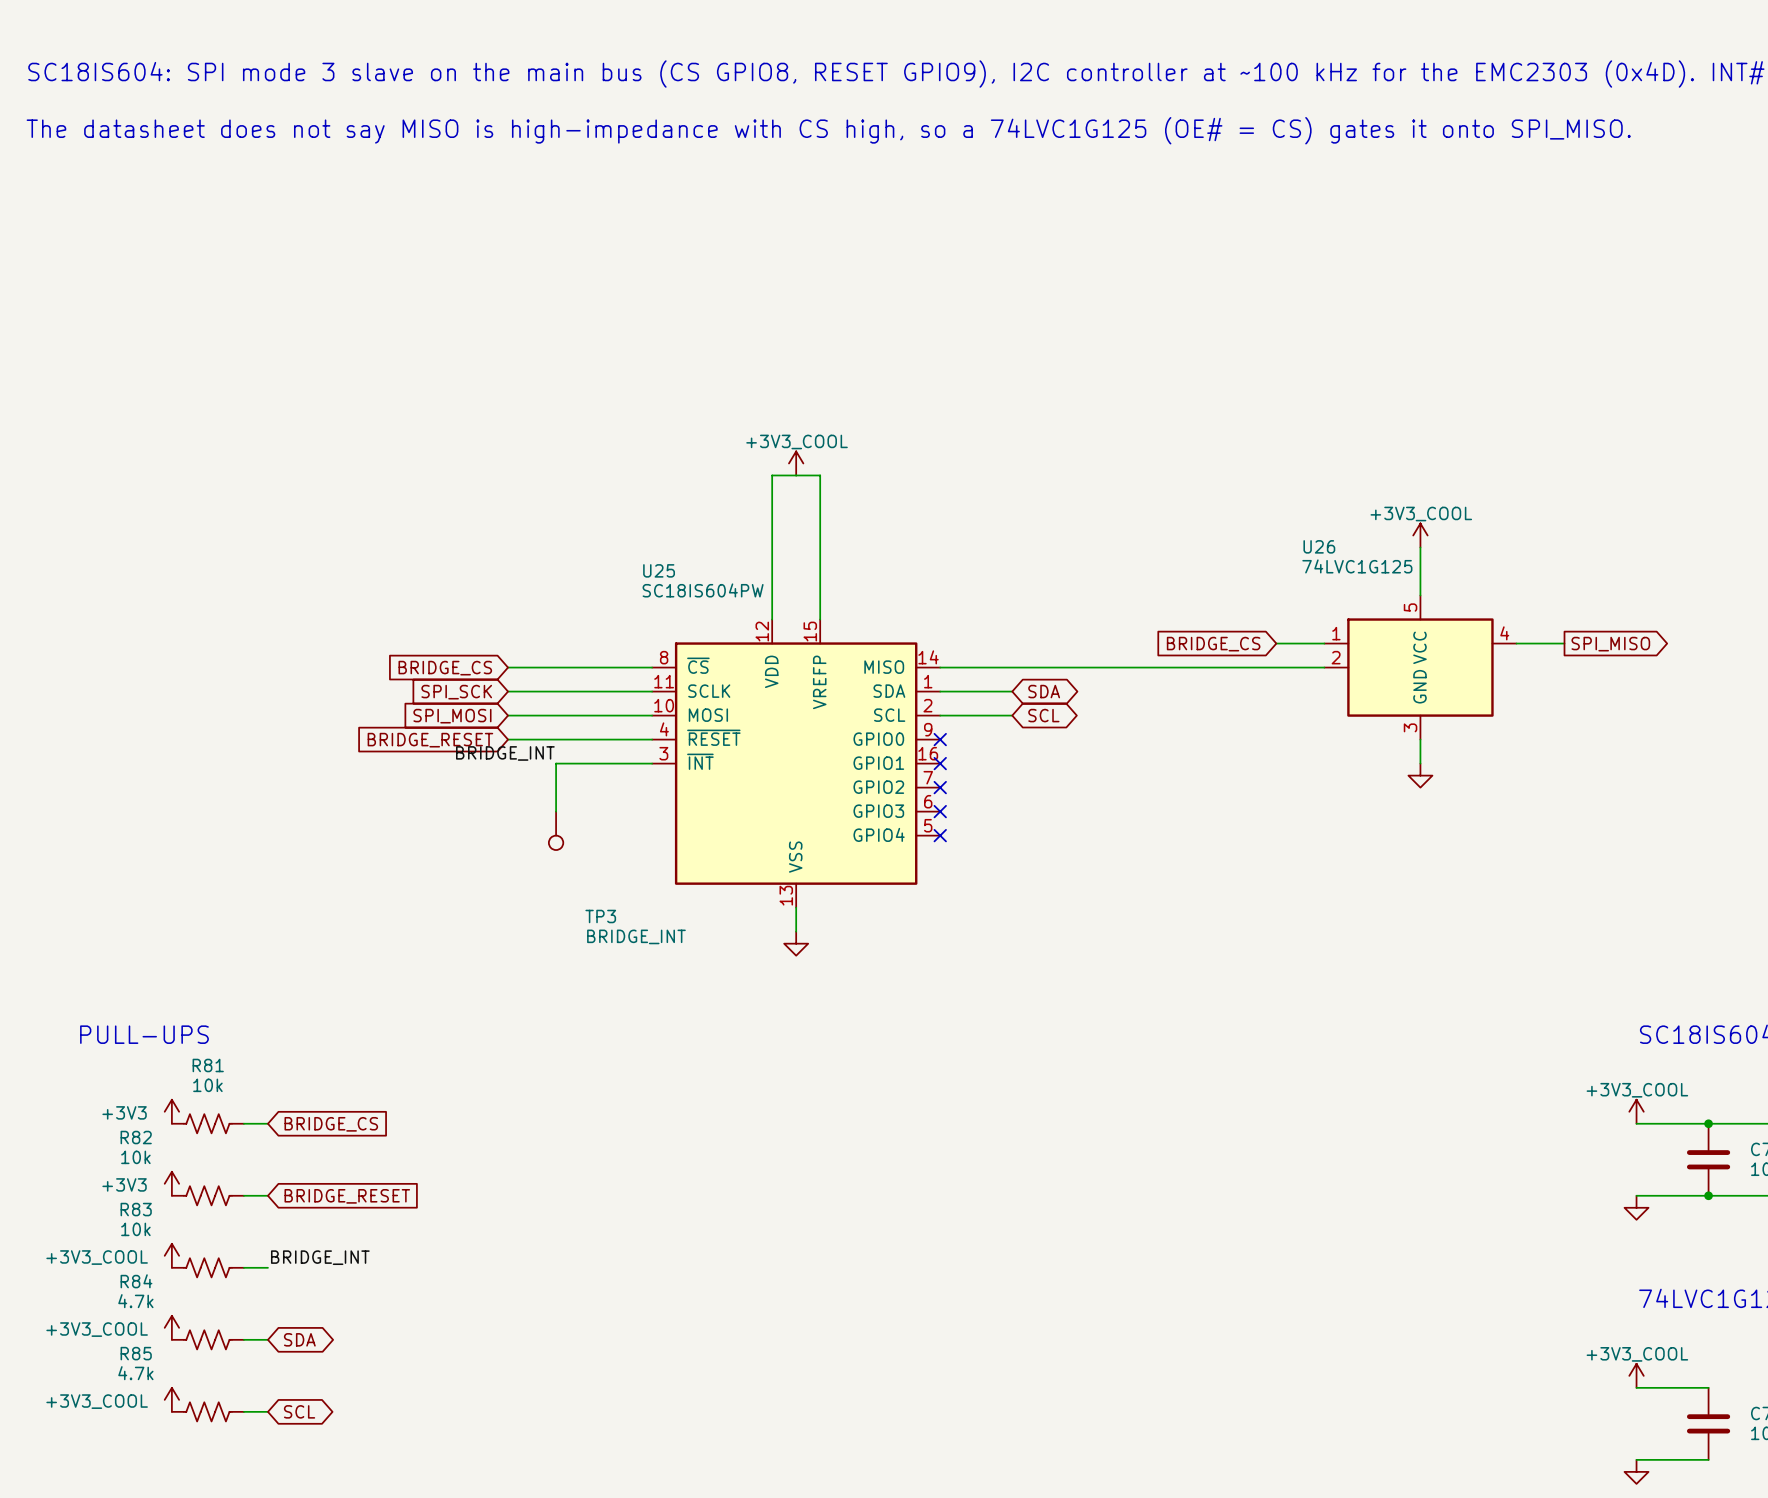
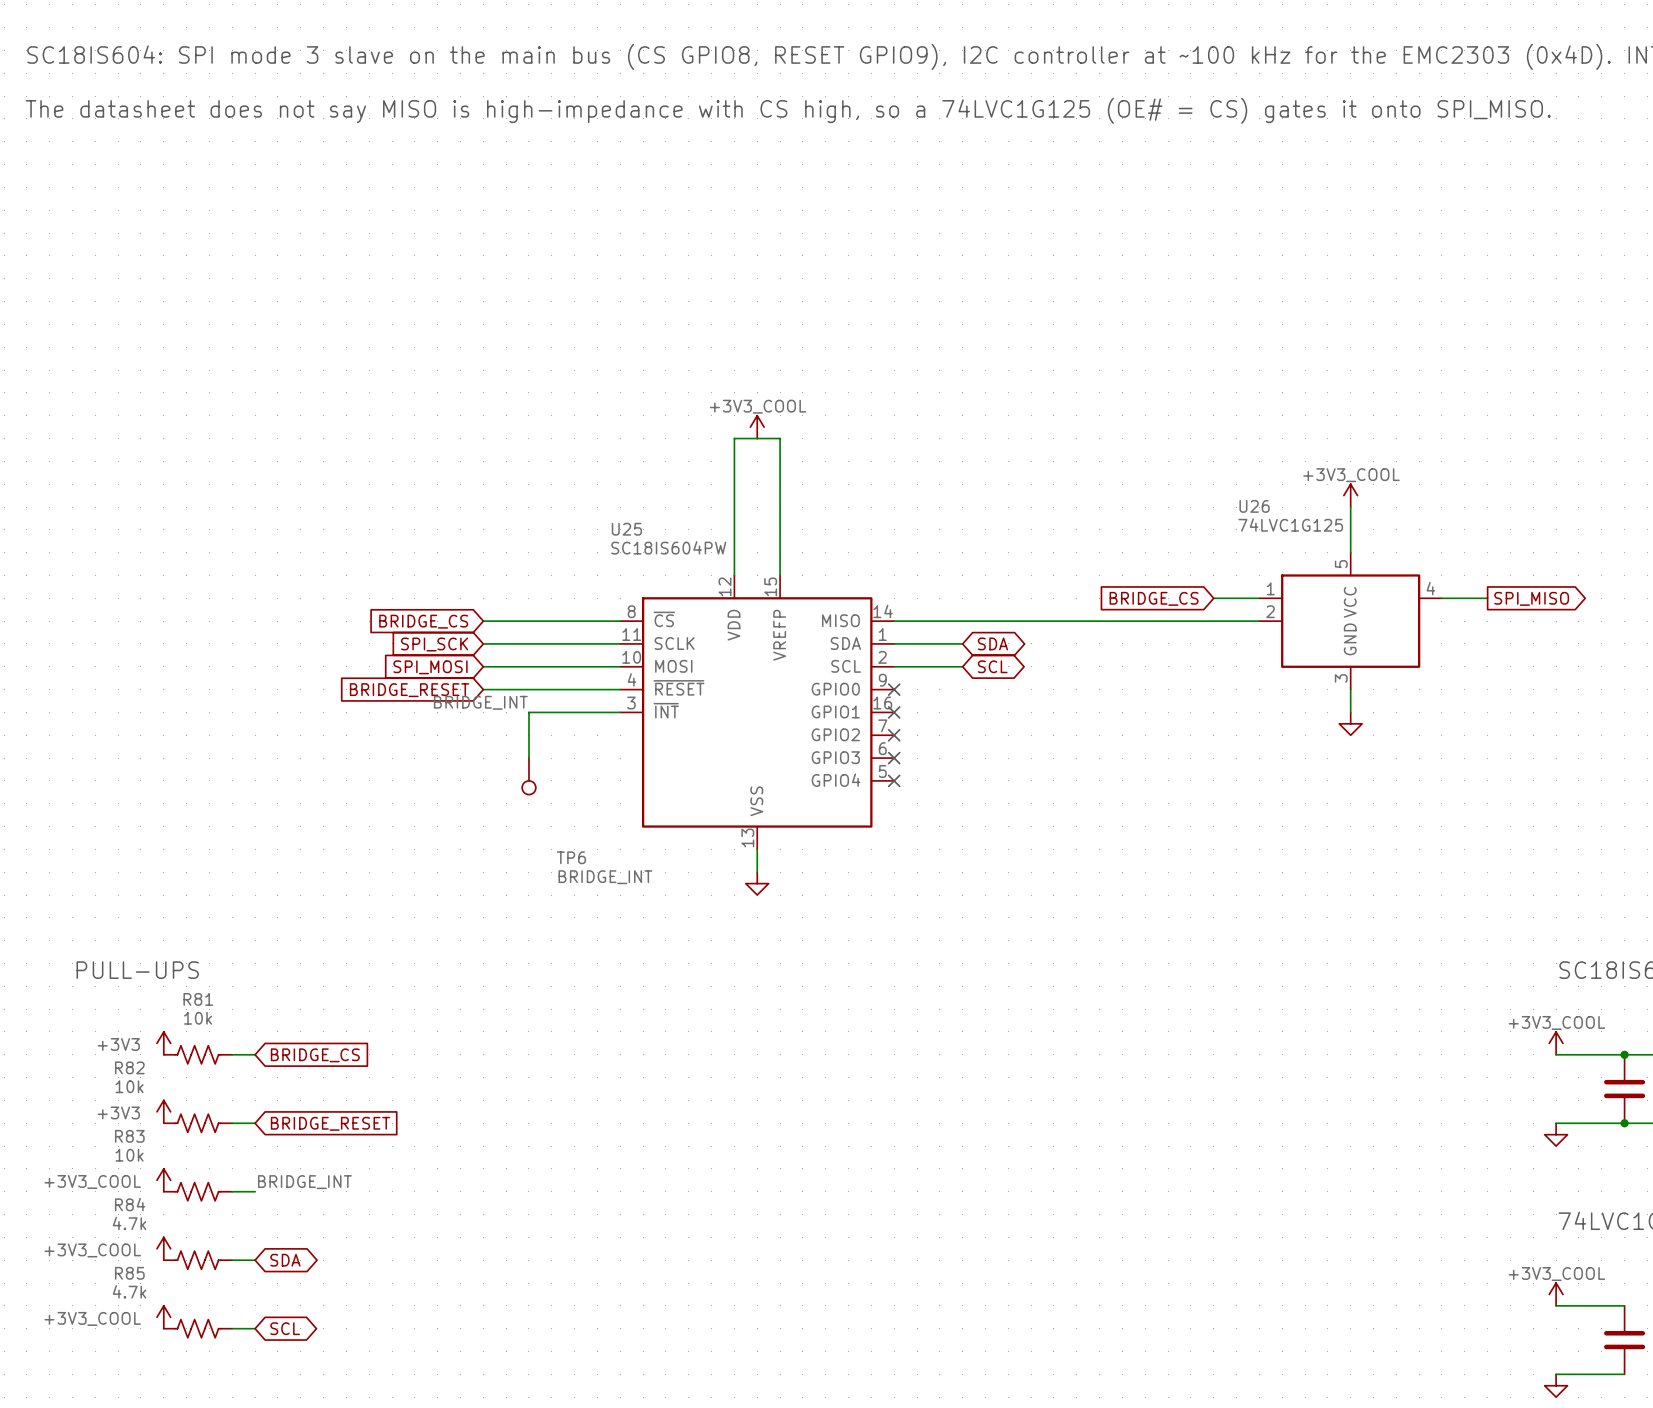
TP3 name: TP3 (600, 916) -> TP6 (571, 857)

